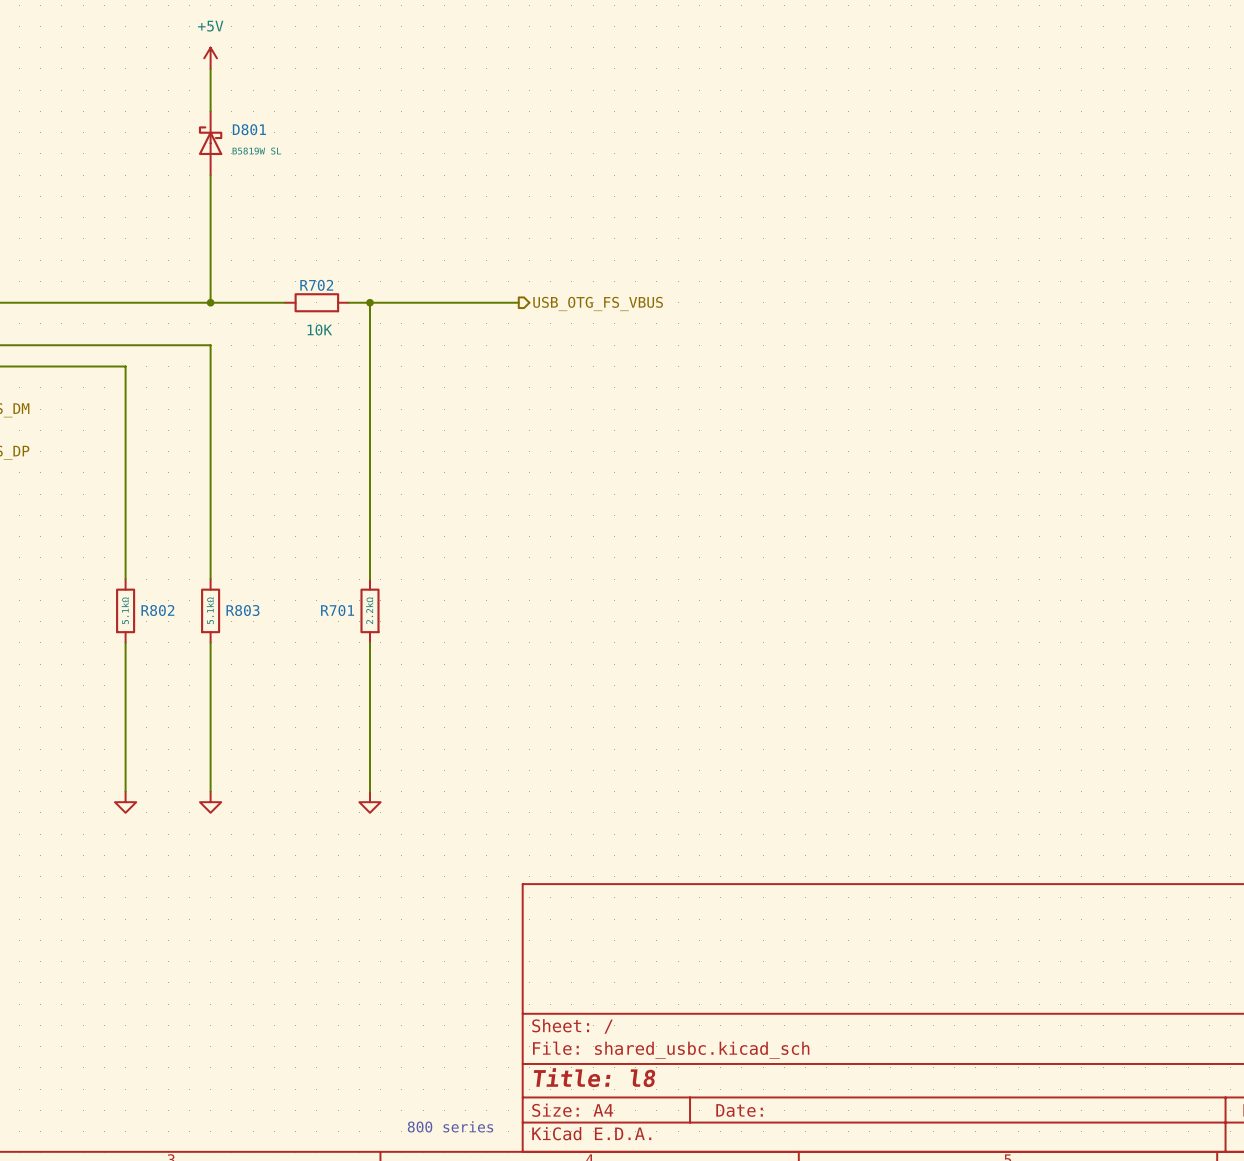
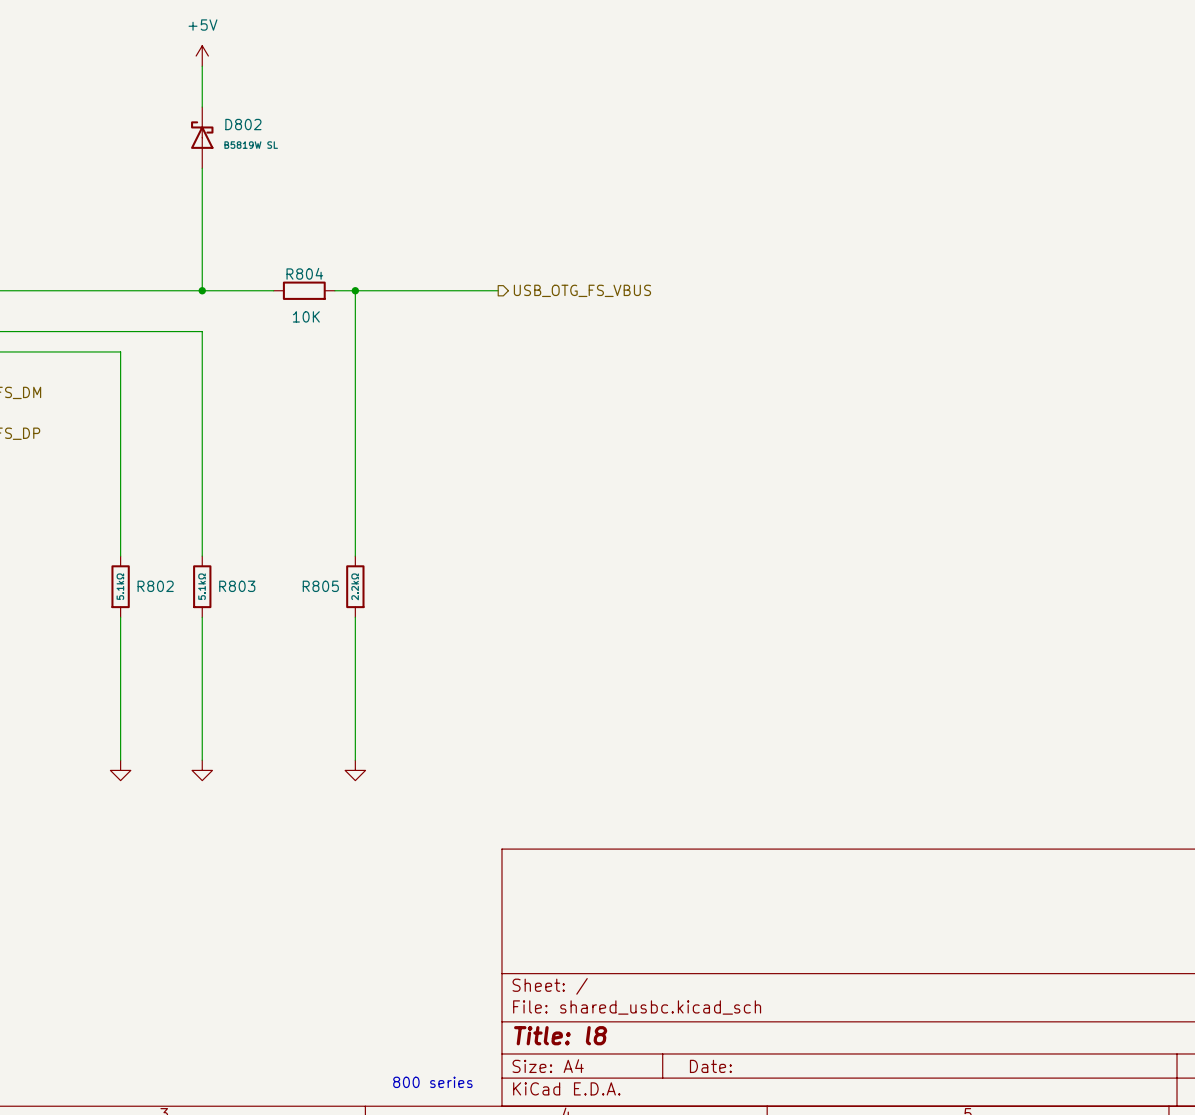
D801 name: D801 (249, 129) -> D802 (243, 124)
R702 name: R702 (316, 285) -> R804 (304, 273)
R701 name: R701 (337, 610) -> R805 (320, 586)

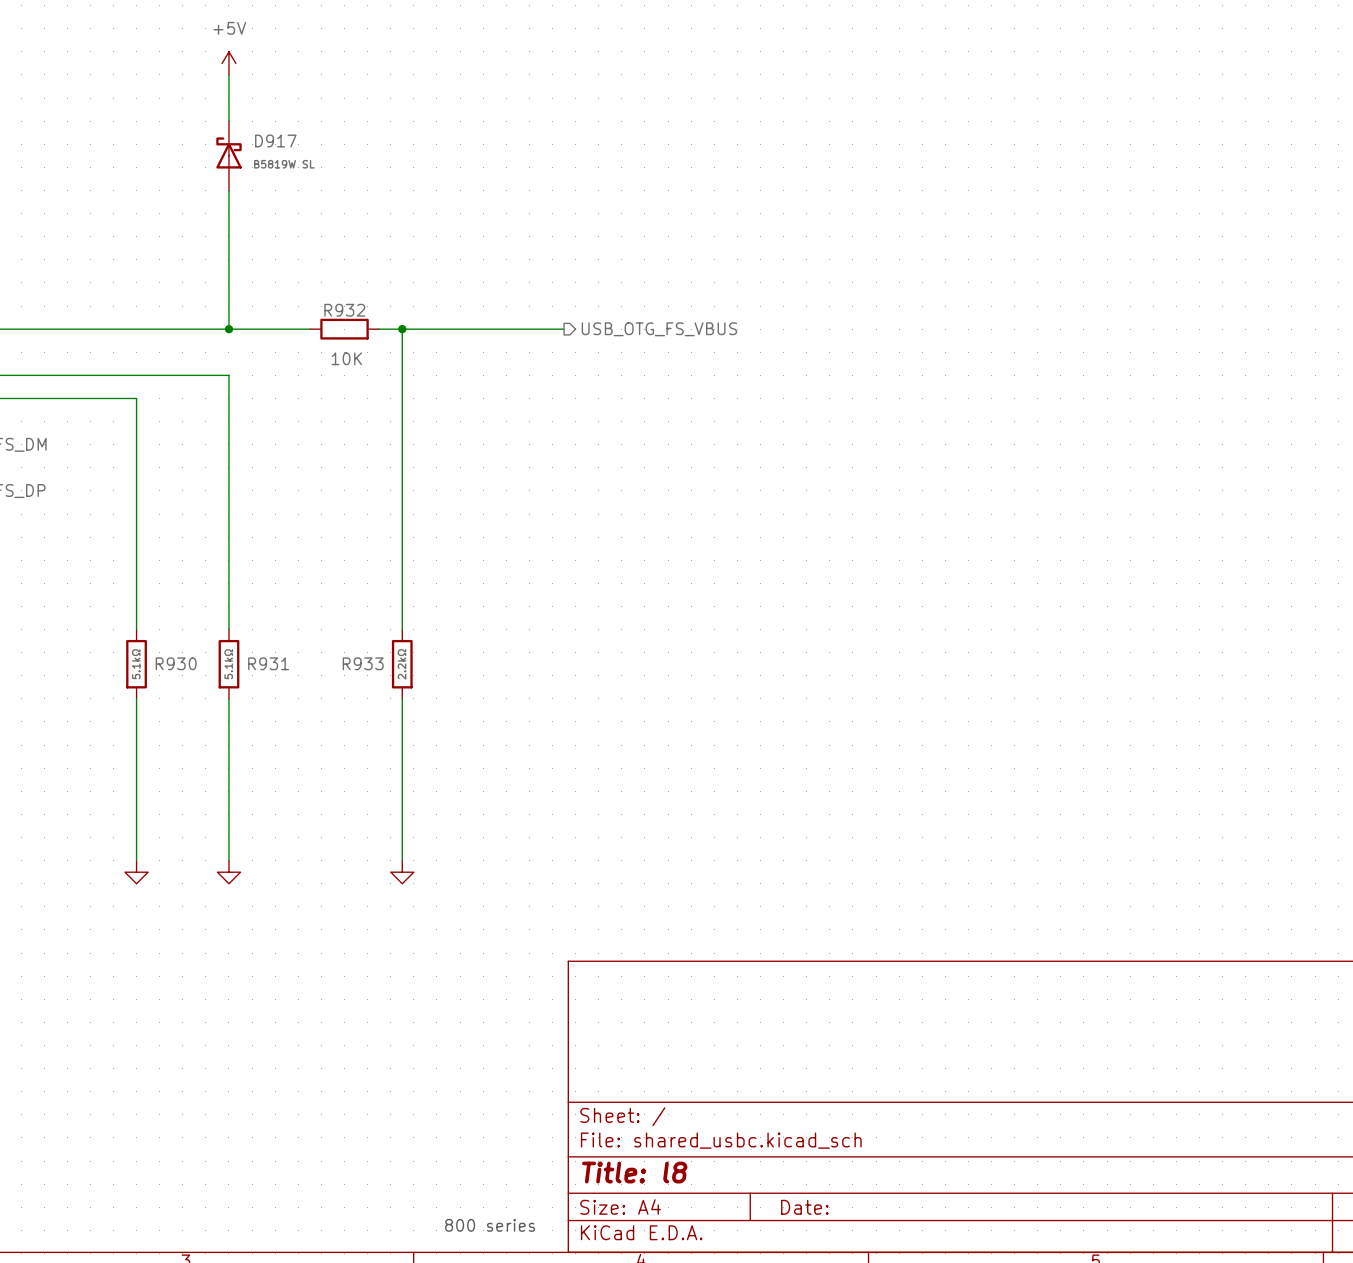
D802 name: D802 (243, 124) -> D917 (275, 140)
R804 name: R804 (304, 273) -> R932 (344, 310)
R802 name: R802 (155, 586) -> R930 (176, 663)
R803 name: R803 (237, 586) -> R931 (268, 663)
R805 name: R805 (320, 586) -> R933 (363, 663)

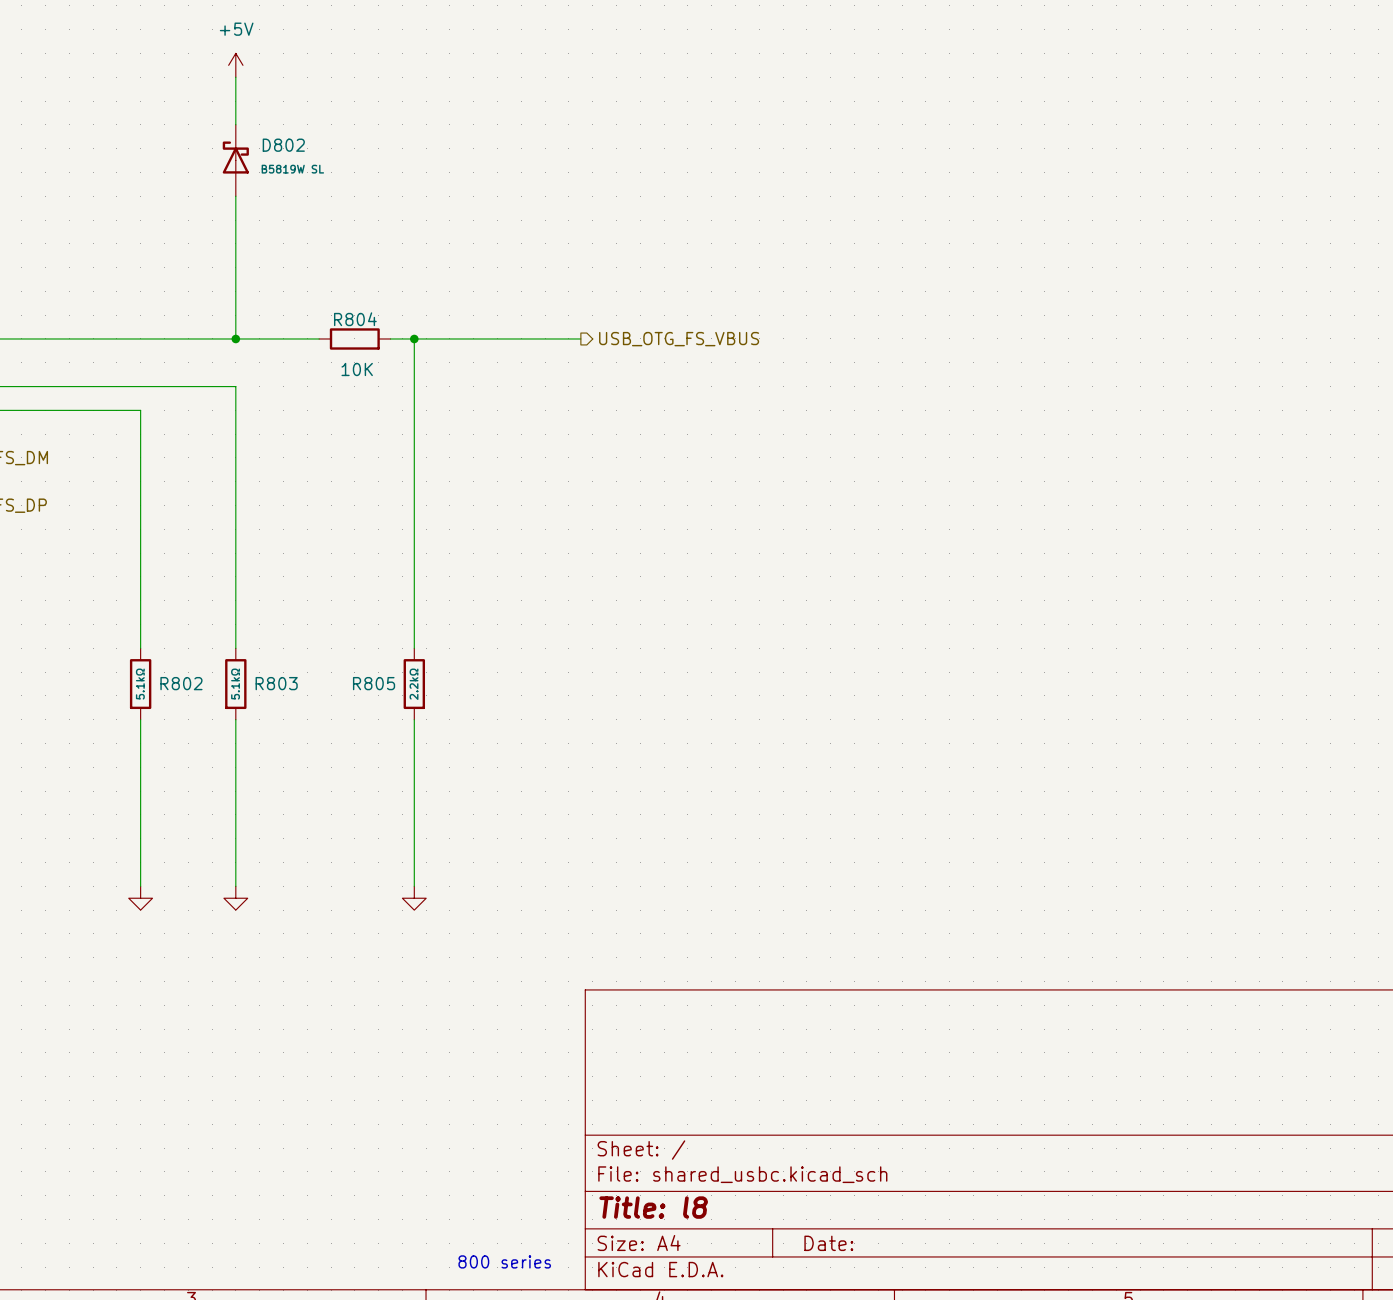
D917 name: D917 (275, 140) -> D802 (283, 145)
R932 name: R932 (344, 310) -> R804 (355, 319)
R930 name: R930 (176, 663) -> R802 (181, 683)
R931 name: R931 (268, 663) -> R803 (276, 683)
R933 name: R933 (363, 663) -> R805 (374, 683)

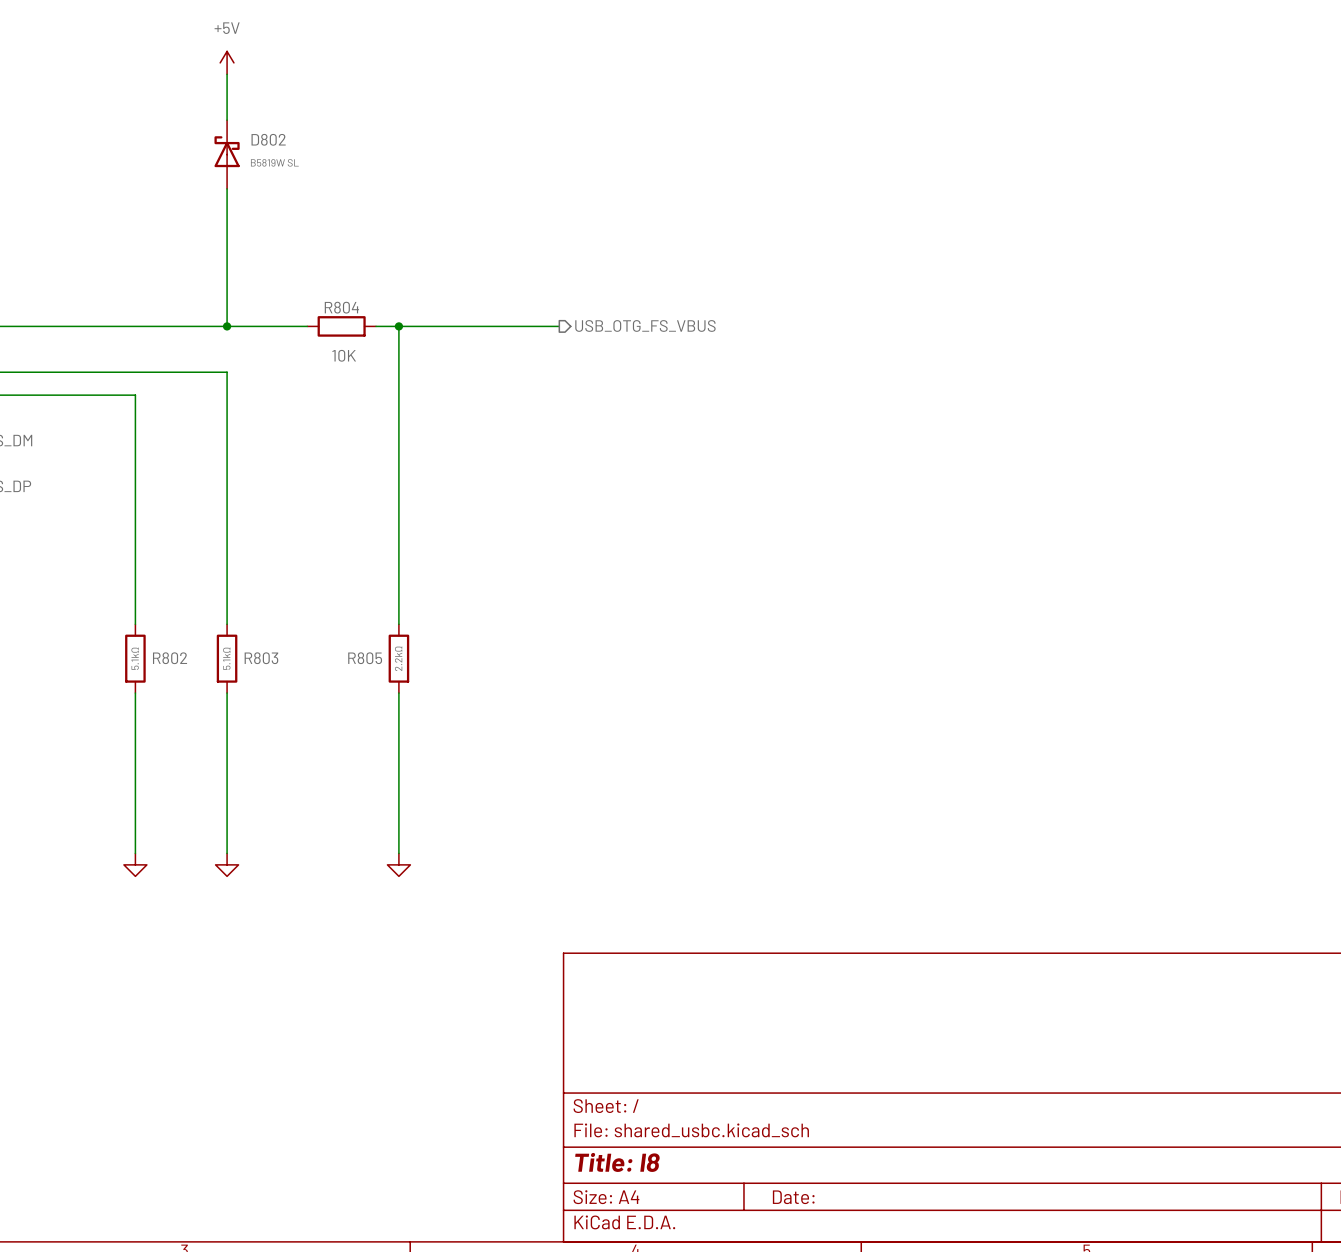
text: 800 series (504, 1261) -> none

